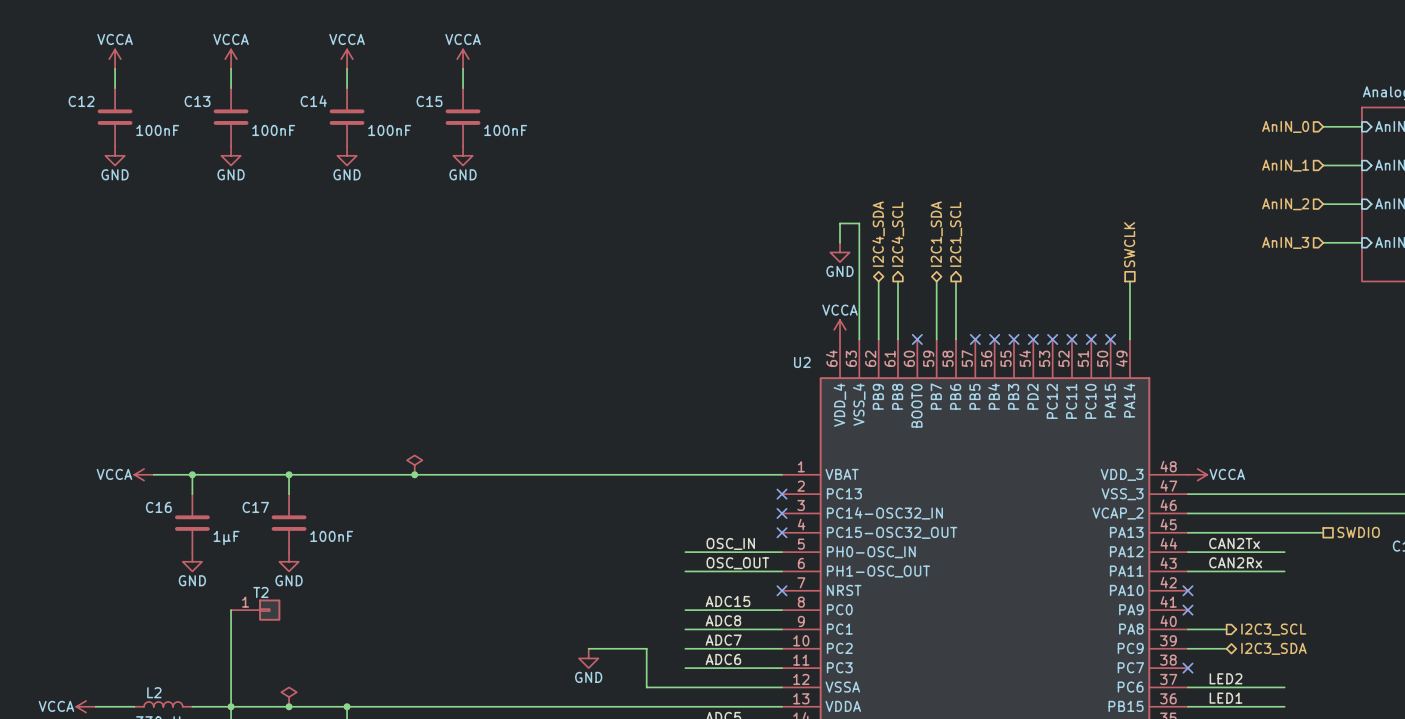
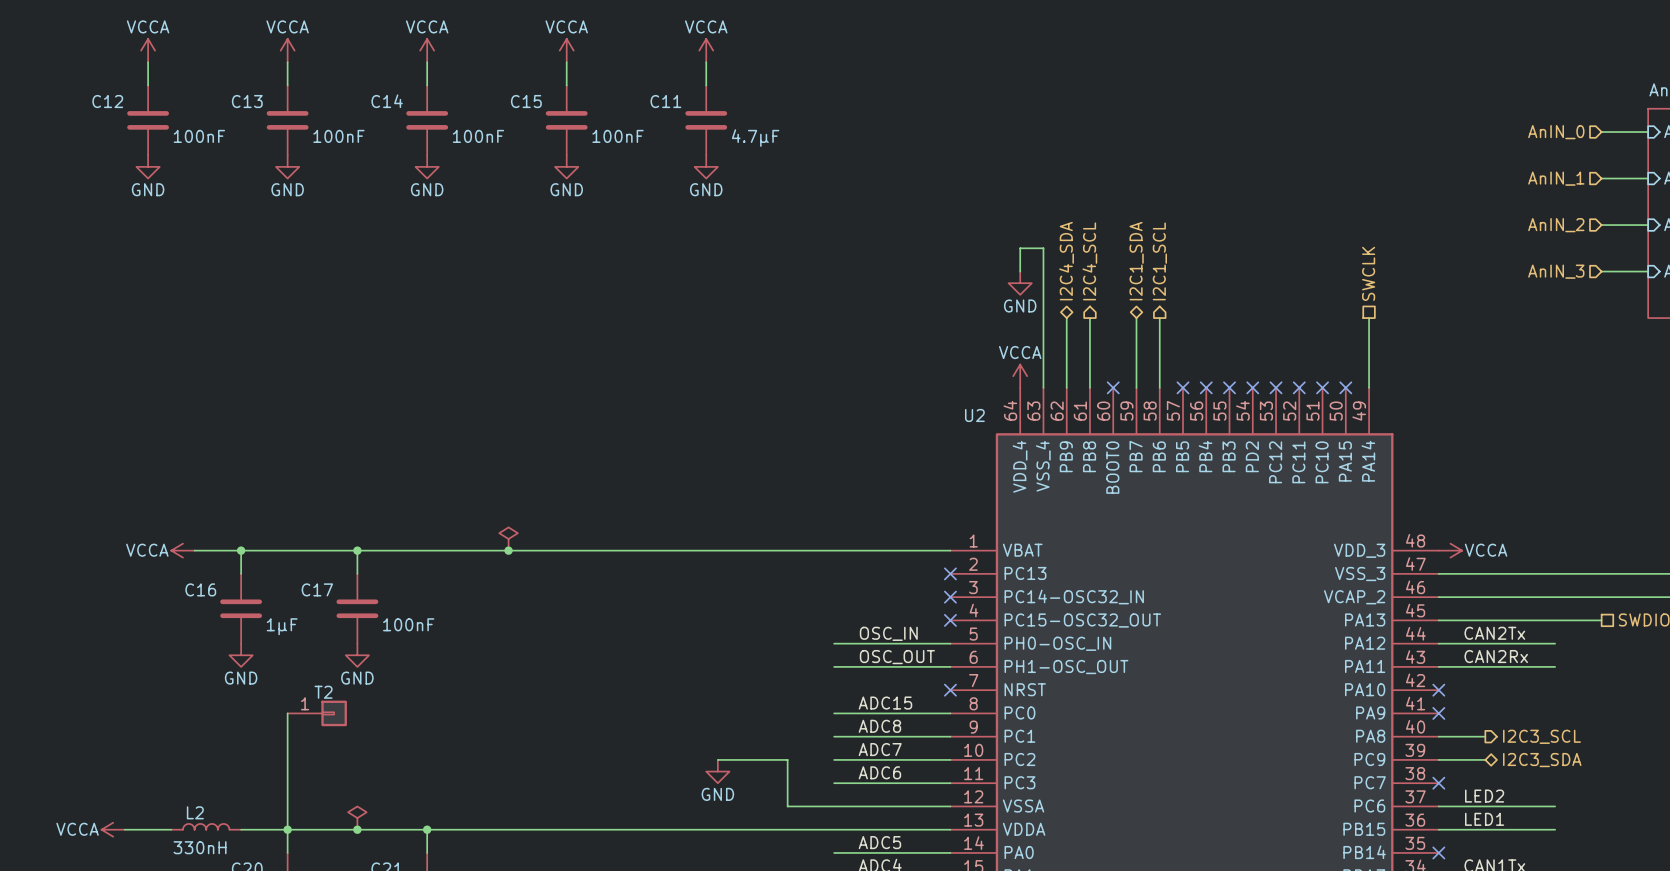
power symbol: none -> VCCA (706, 50)
wire: none -> (706, 62) (706, 85)
C11: none -> (706, 120)
power symbol: none -> GND (706, 166)

